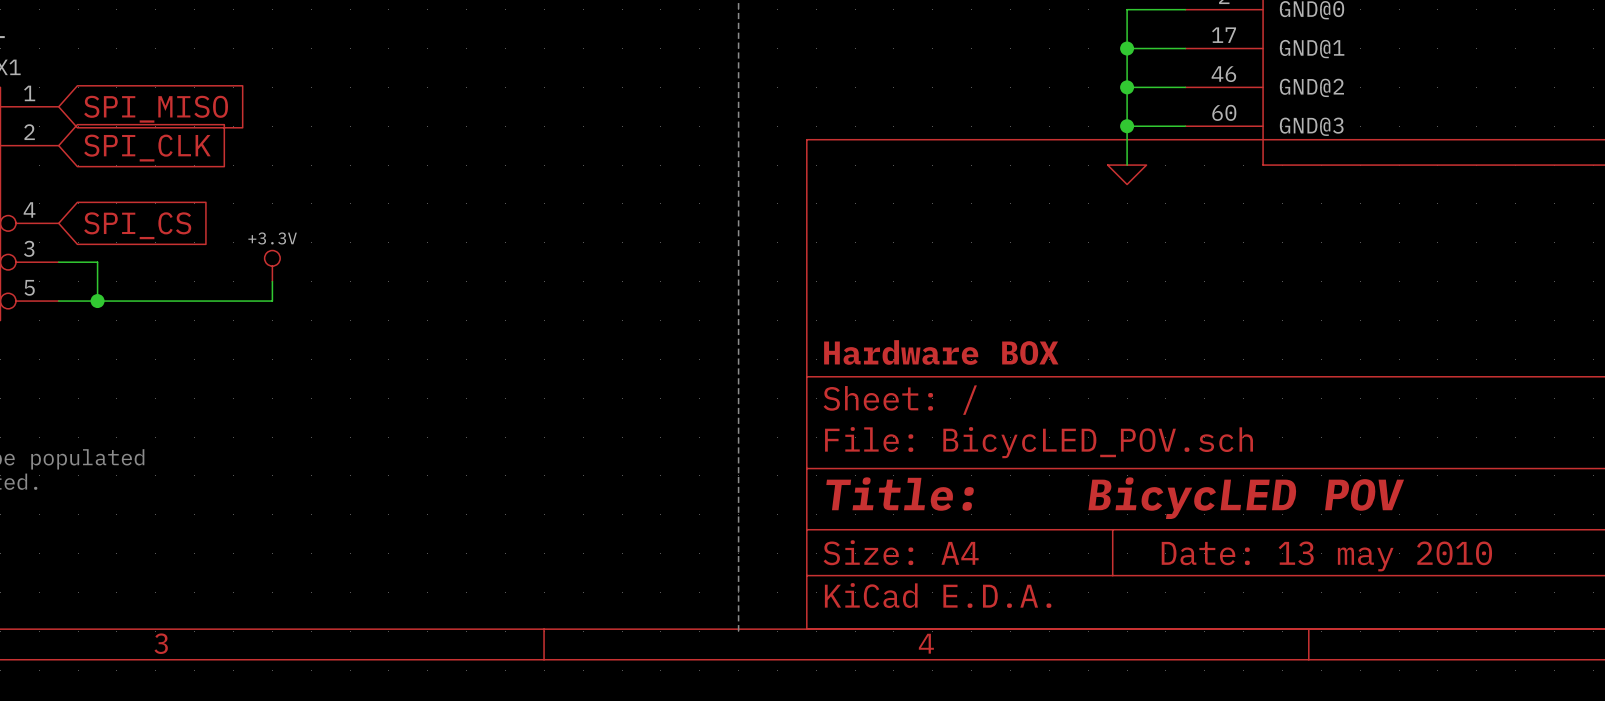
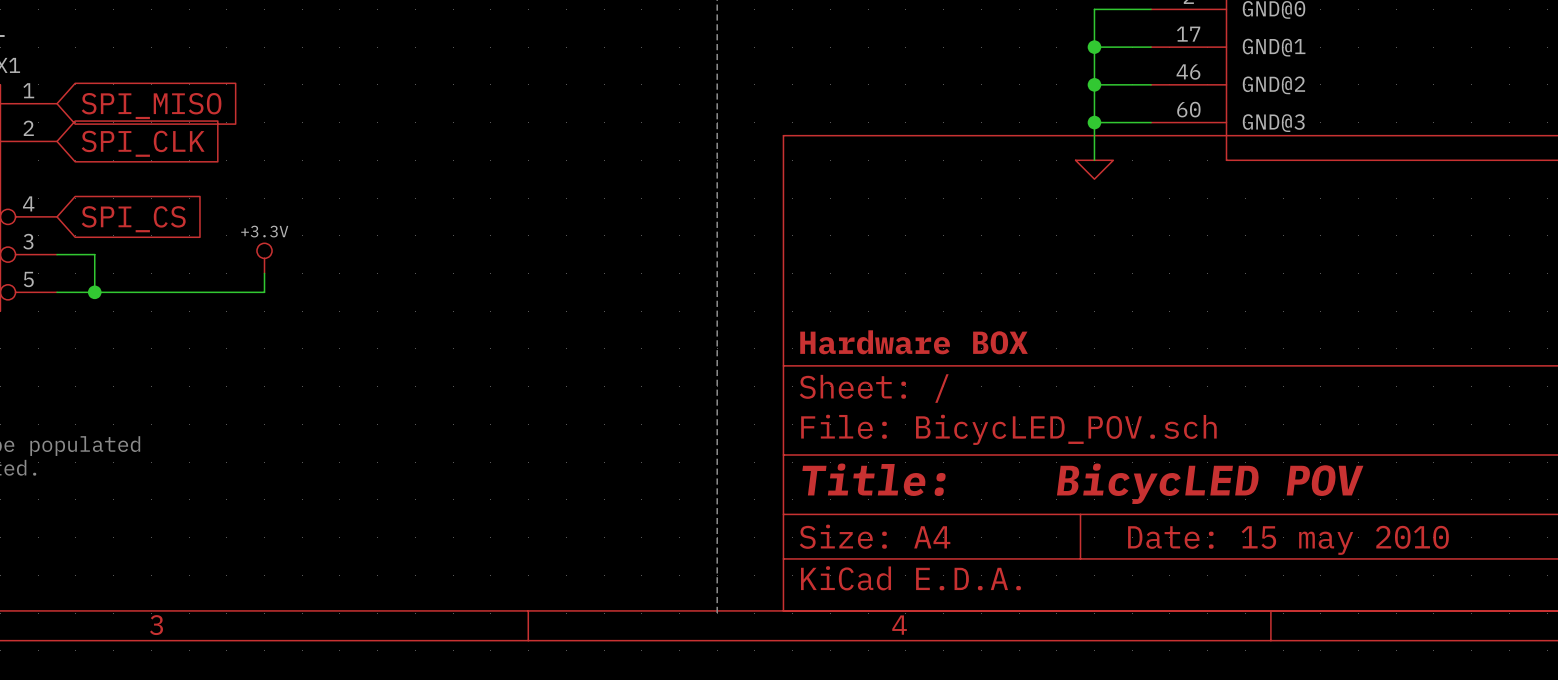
title block: Date: 13 may 2010 (1326, 556) -> Date: 15 may 2010 (1288, 540)

